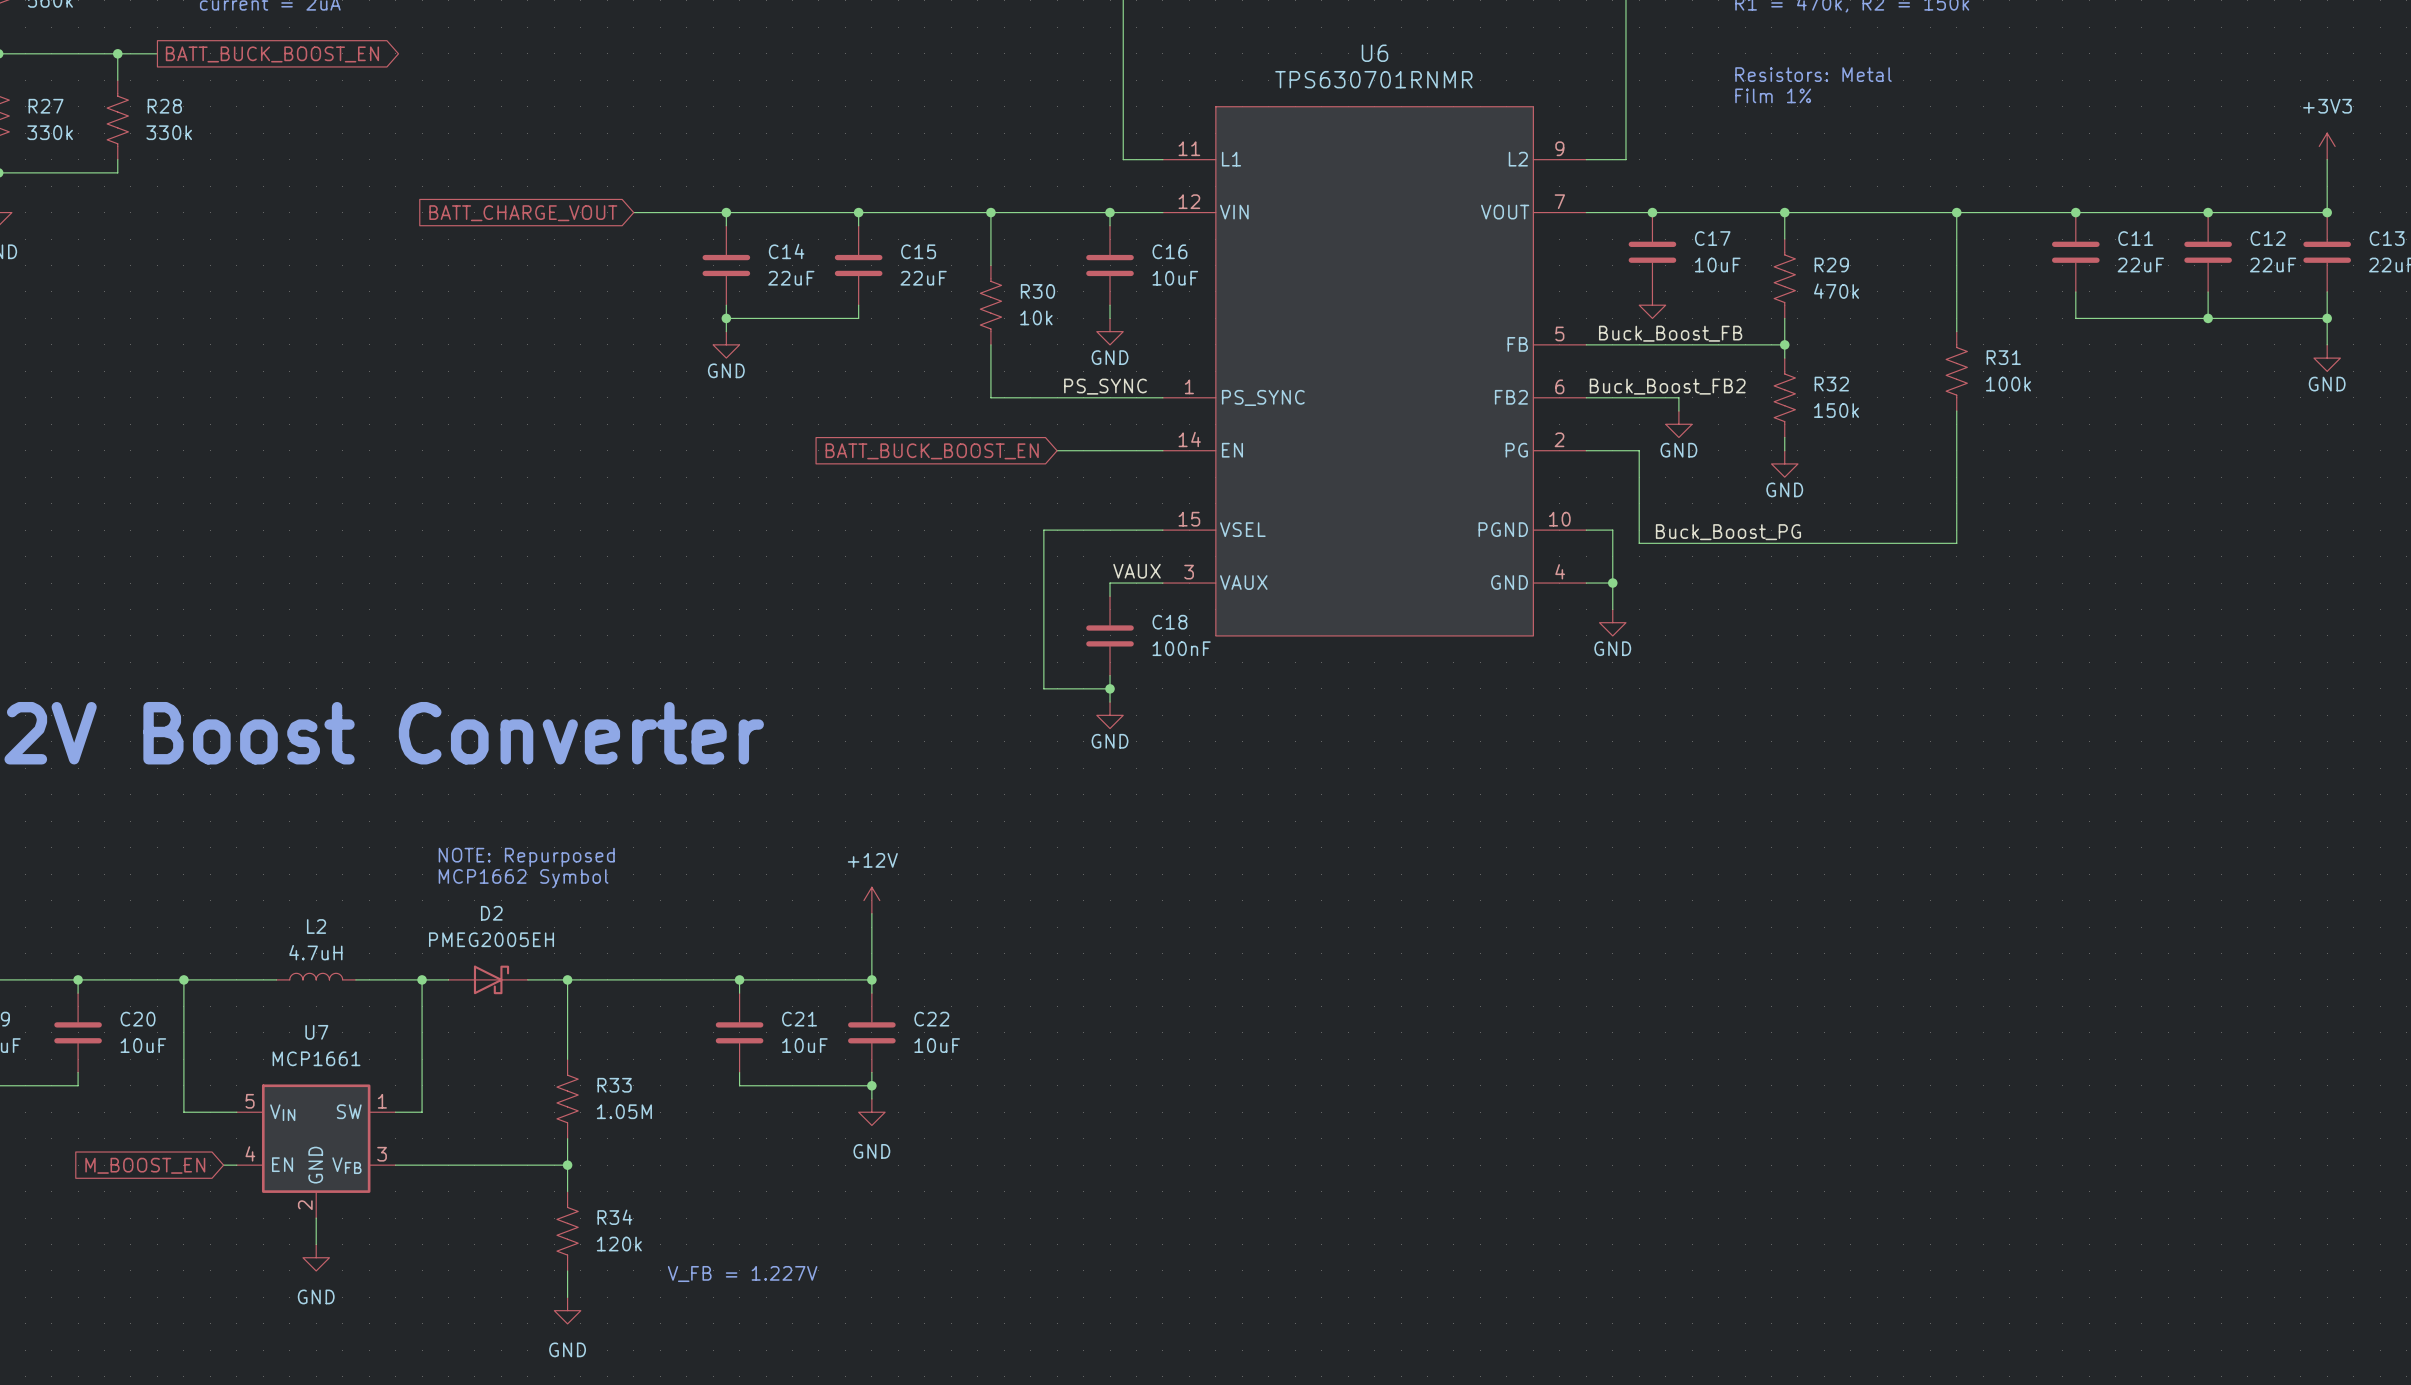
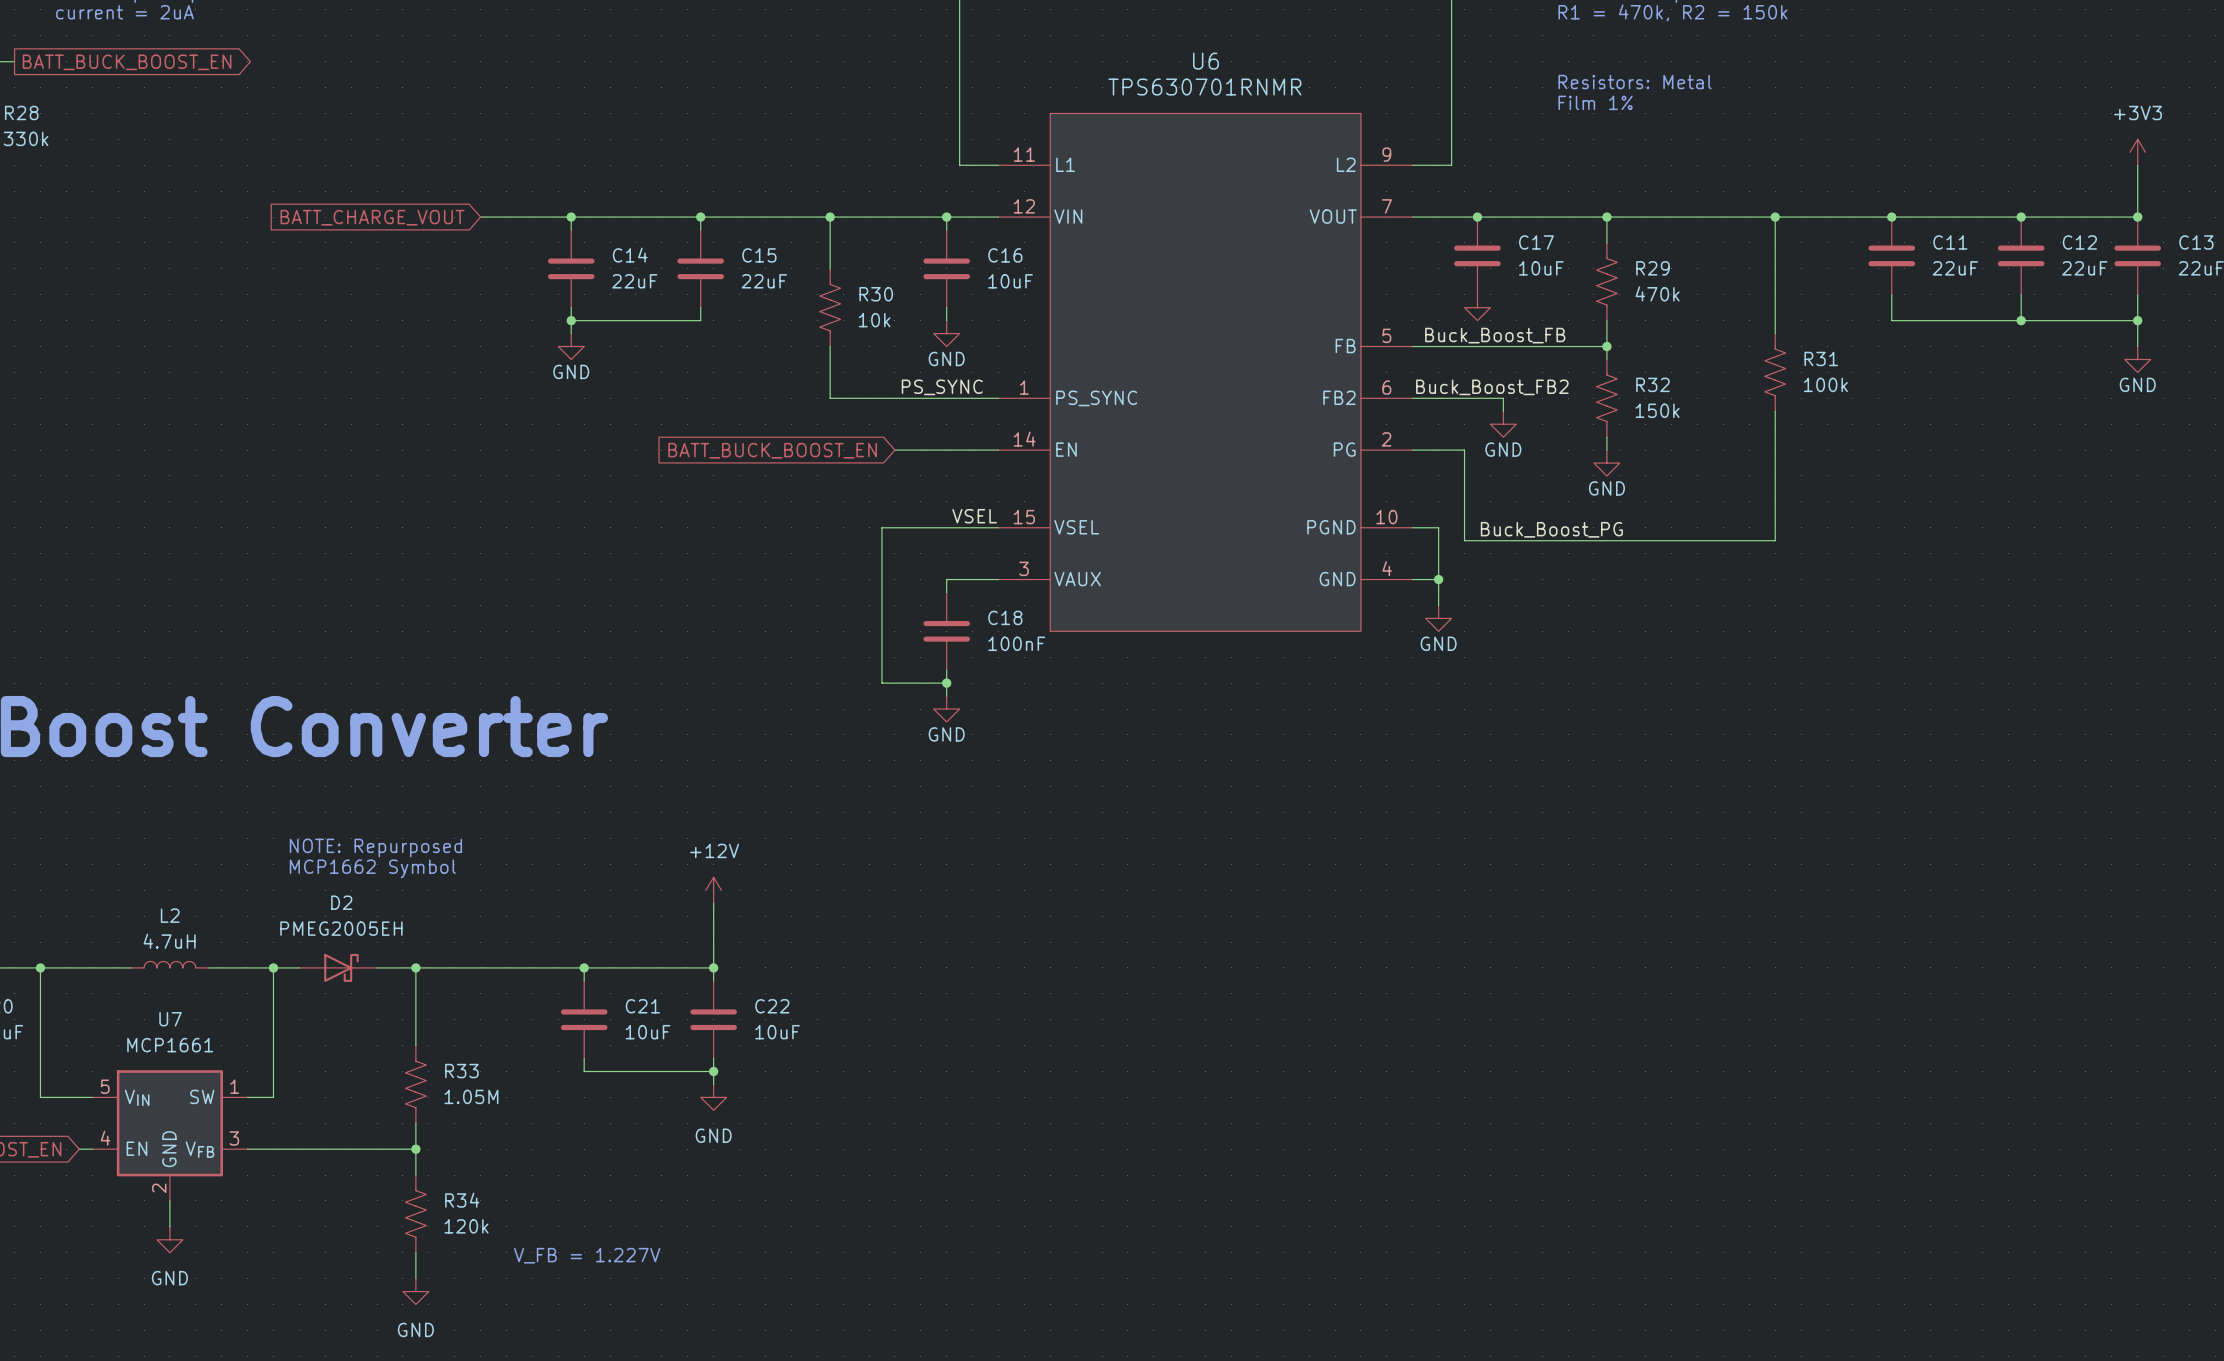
label: none -> VSEL (974, 516)
label: VAUX (1137, 571) -> none

